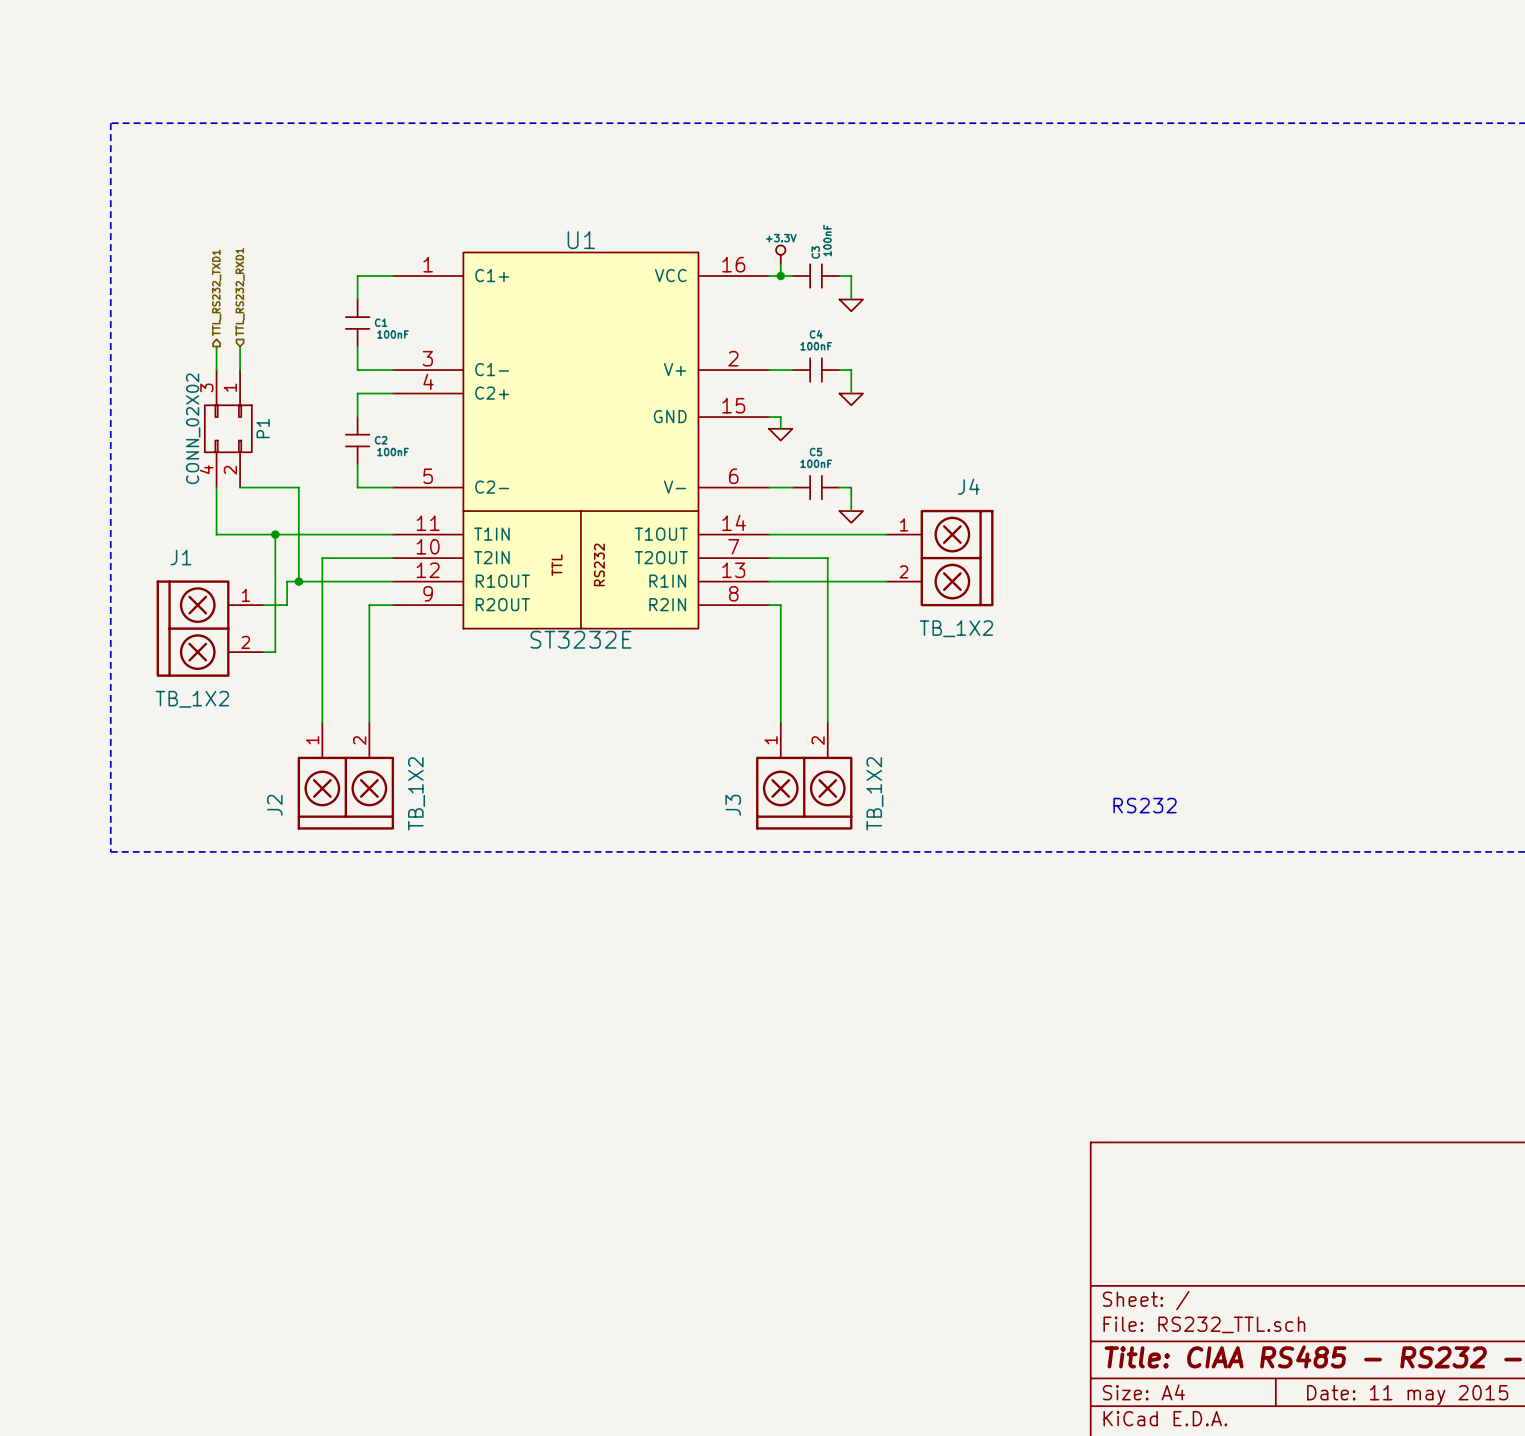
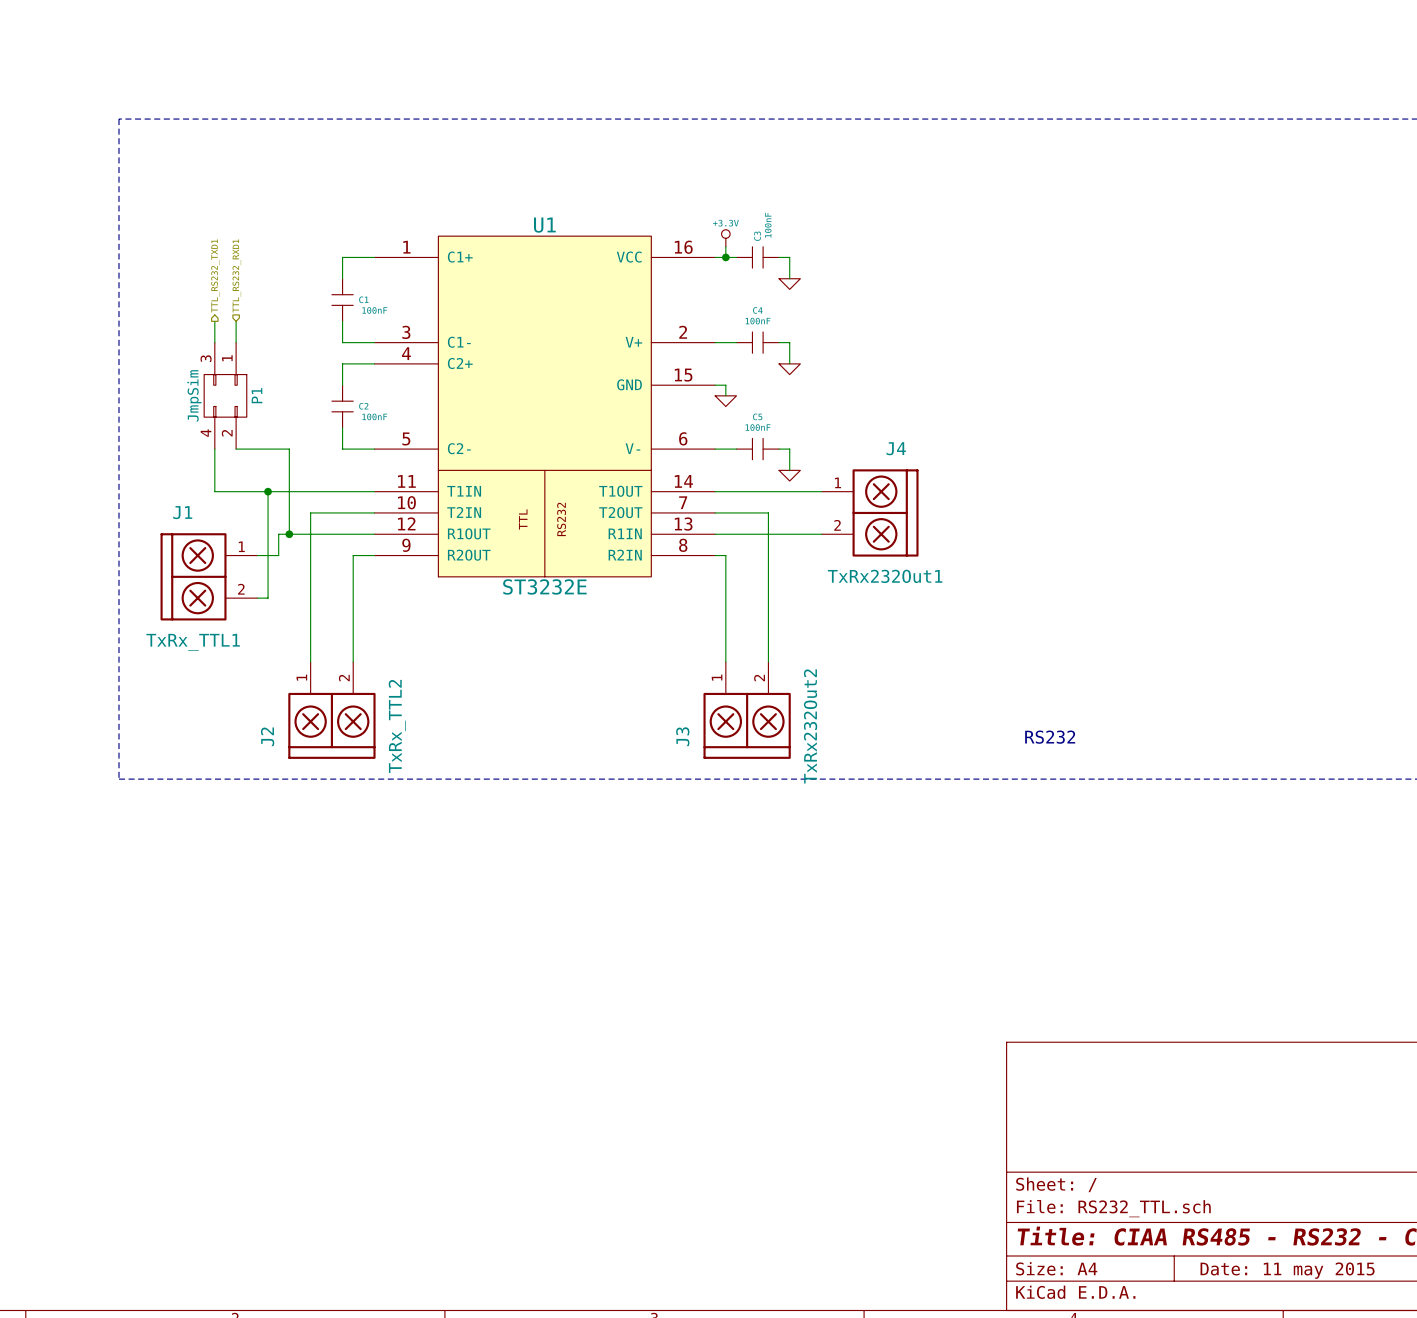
P1 value: CONN_02X02 (193, 428) -> JmpSim (194, 395)
J4 value: TB_1X2 (956, 628) -> TxRx232Out1 (885, 576)
J1 value: TB_1X2 (192, 699) -> TxRx_TTL1 (193, 642)
J2 value: TB_1X2 (416, 793) -> TxRx_TTL2 (397, 726)
J3 value: TB_1X2 (874, 793) -> TxRx232Out2 (810, 726)

